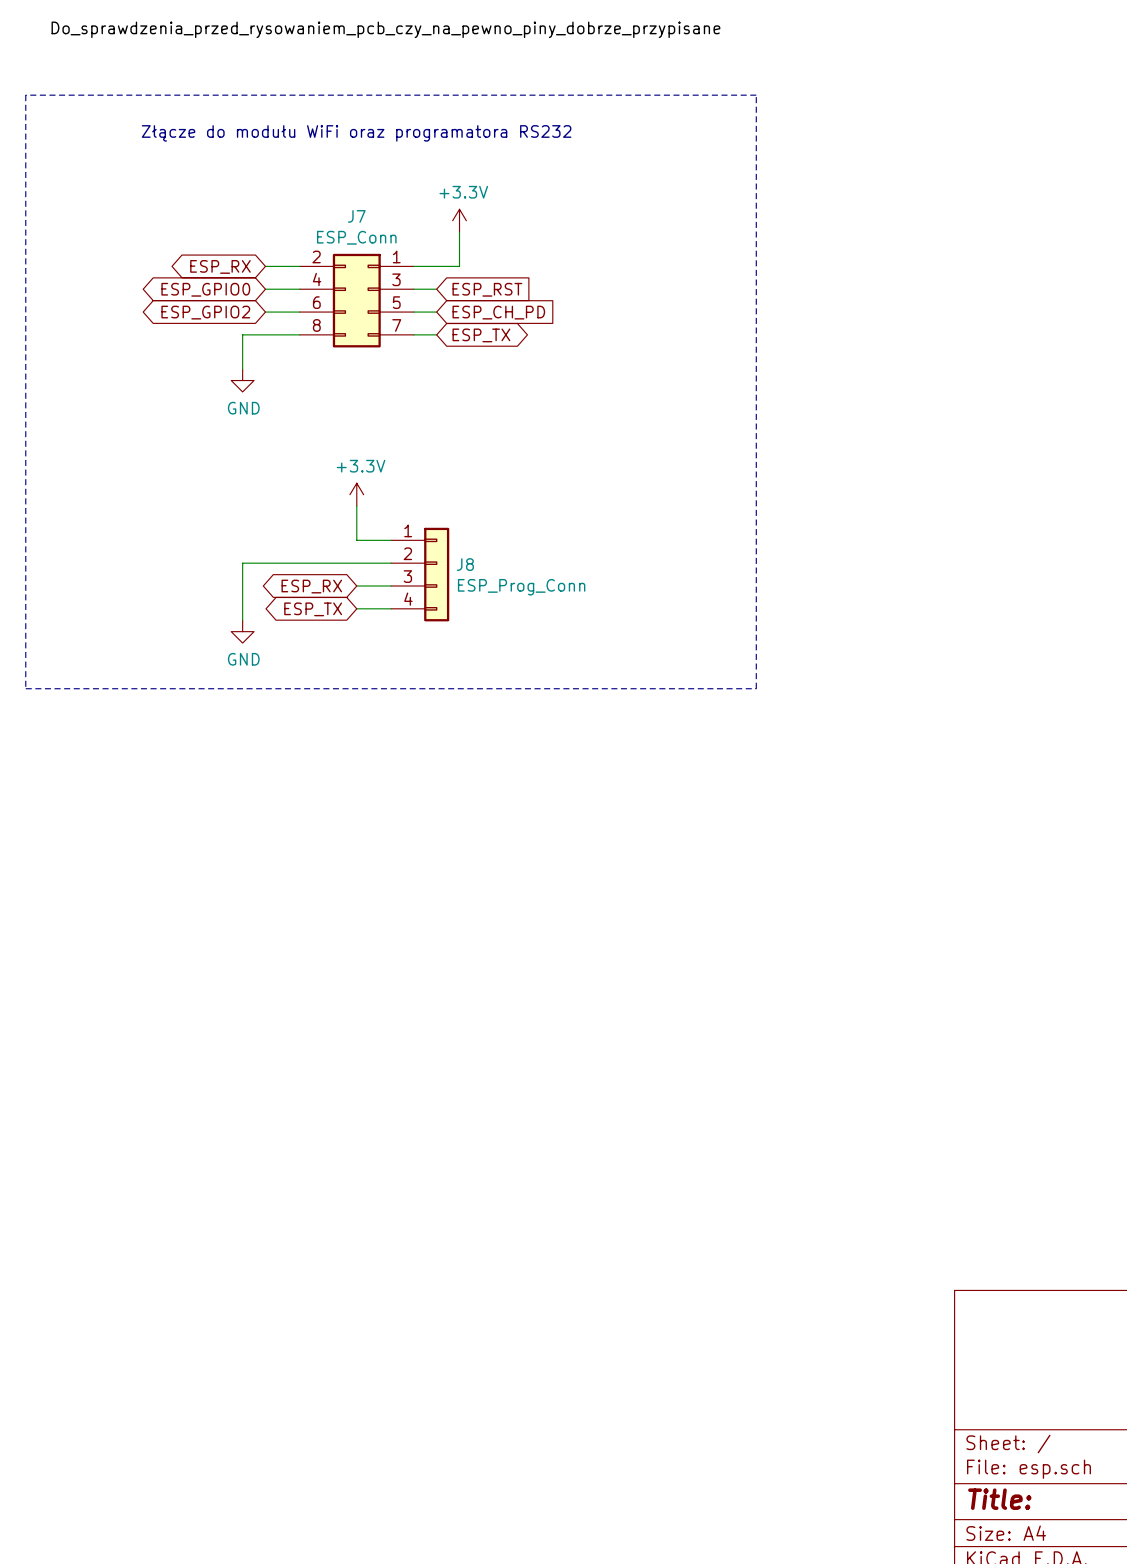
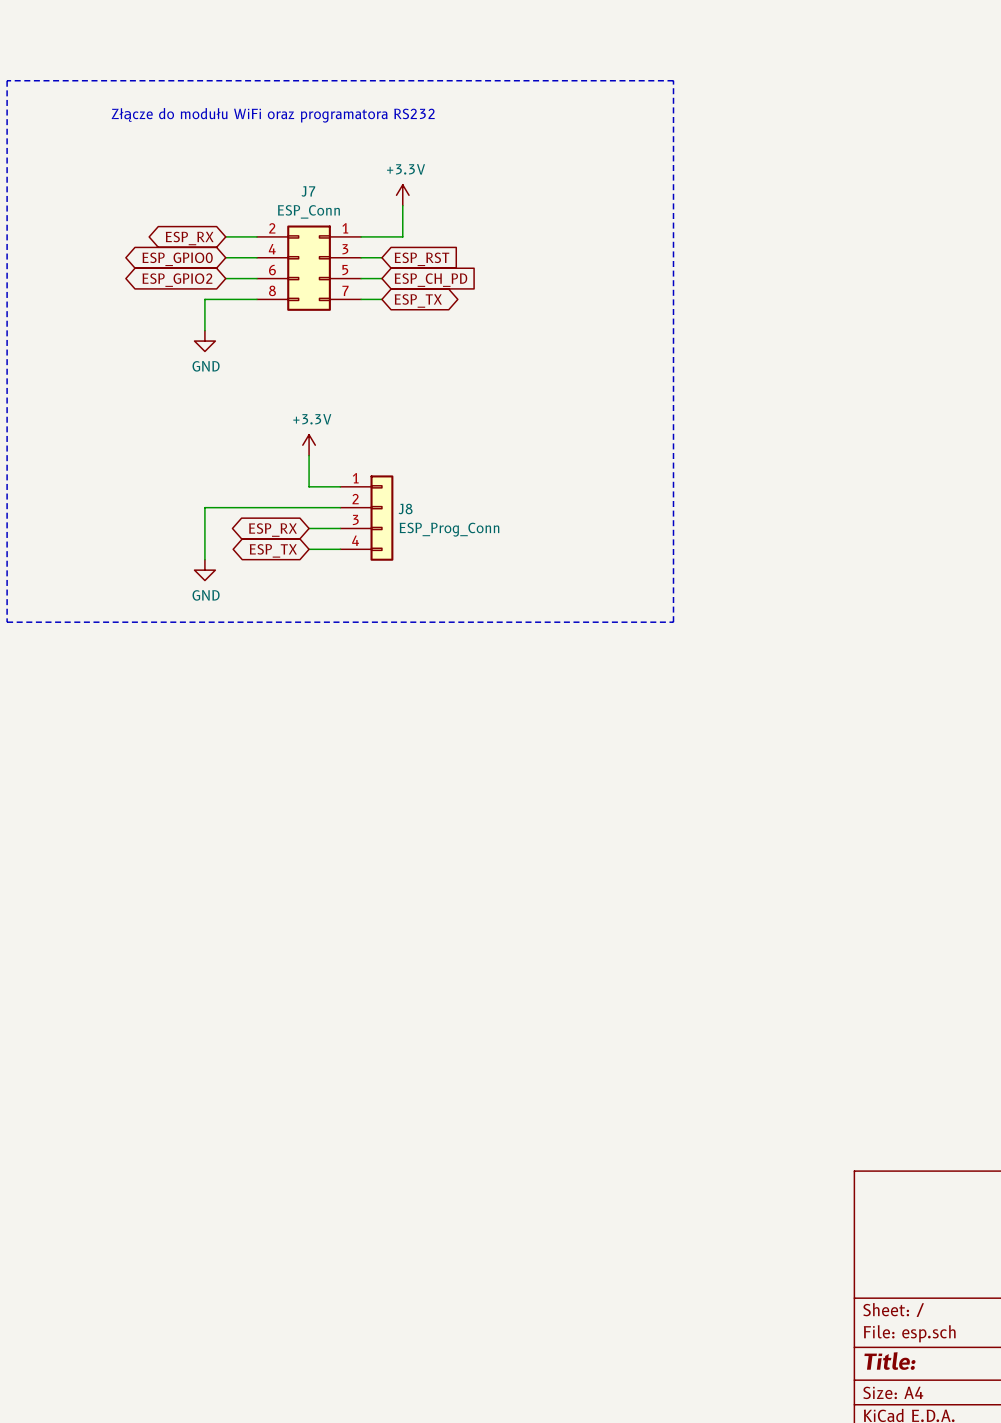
label: Do_sprawdzenia_przed_rysowaniem_pcb_czy_na_pewno_piny_dobrze_przypisane (385, 29) -> none

